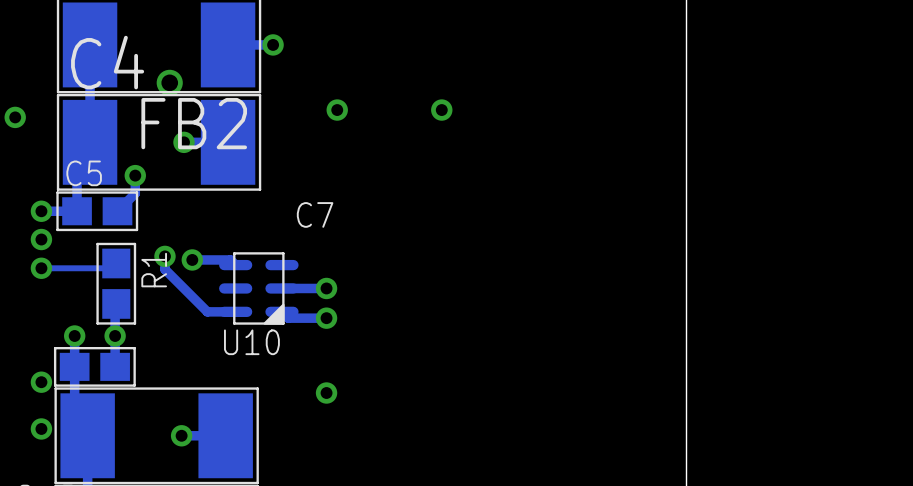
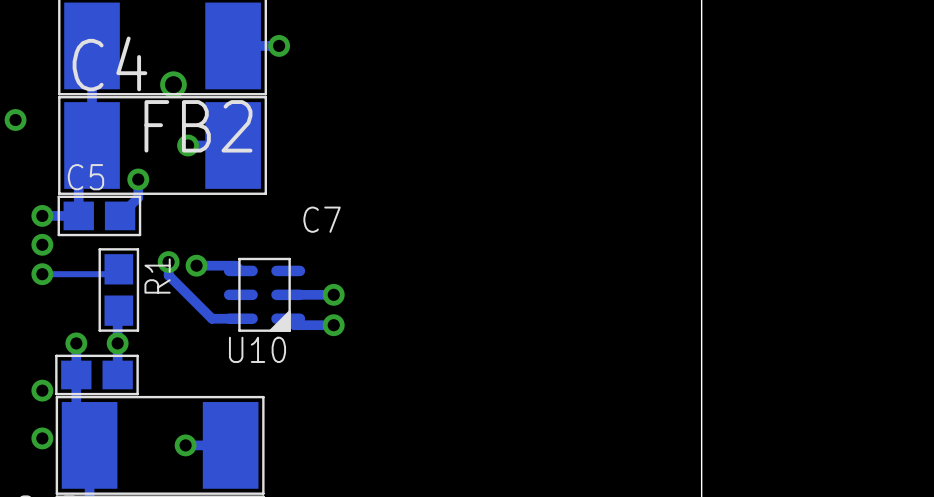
via: (337, 110) -> none
via: (441, 110) -> none
via: (326, 393) -> none

